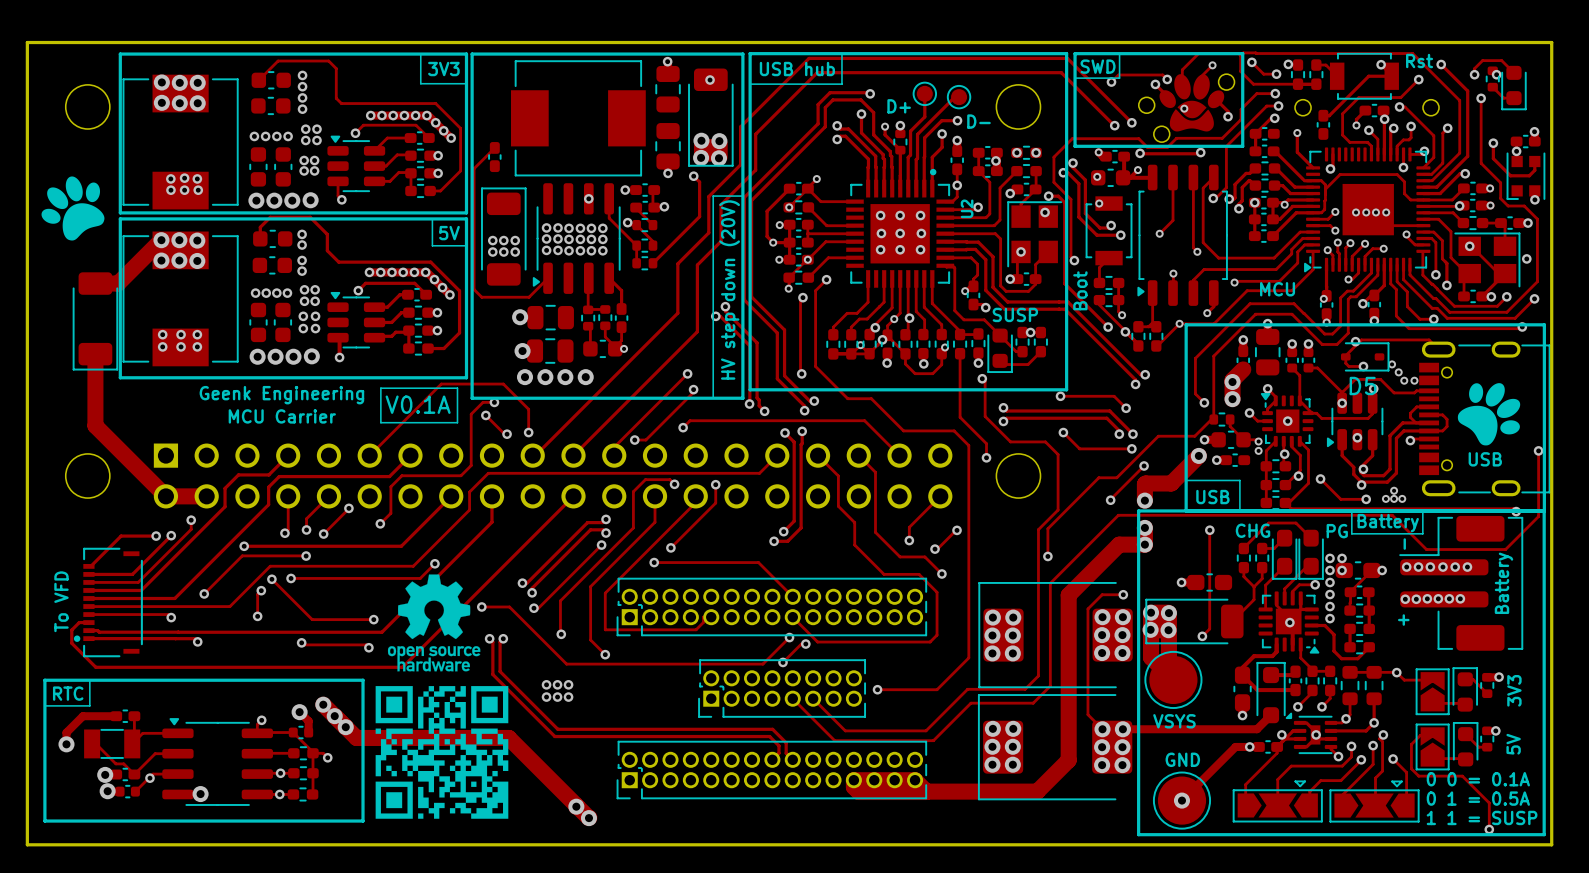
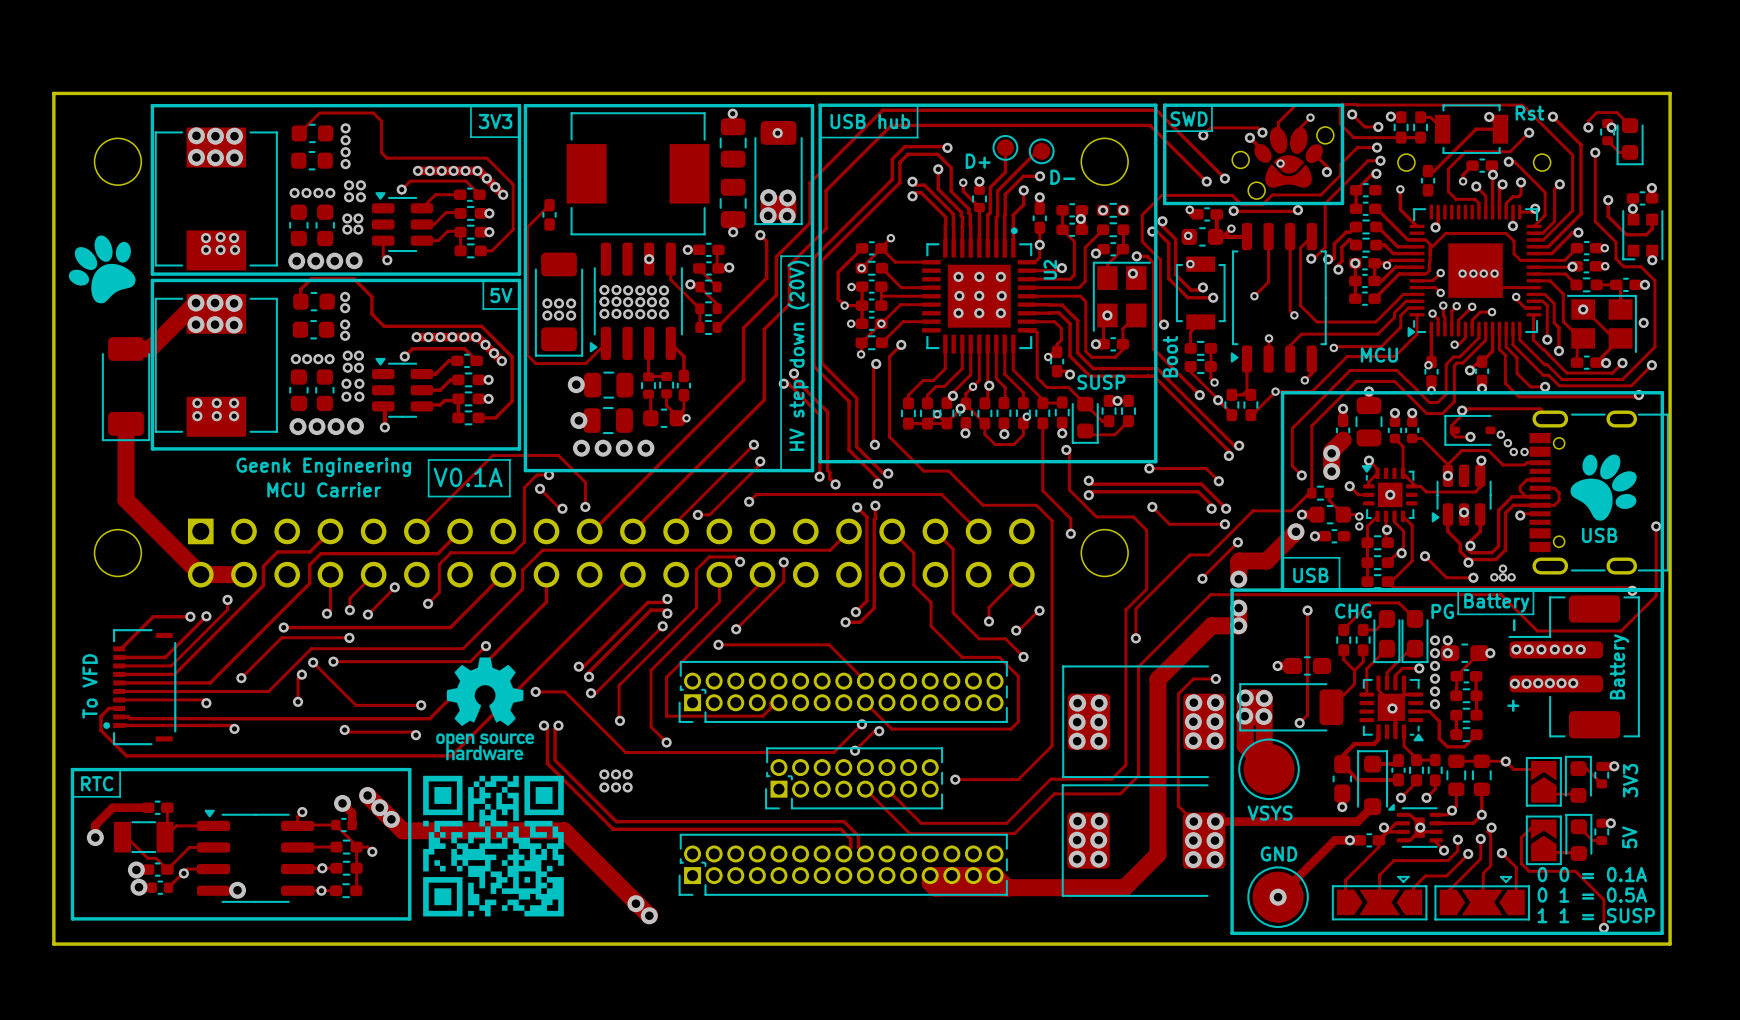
part rotation: 0° (503, 236) -> 180° (559, 304)
D5: (1365, 356) -> none
part: none -> (1470, 430)

